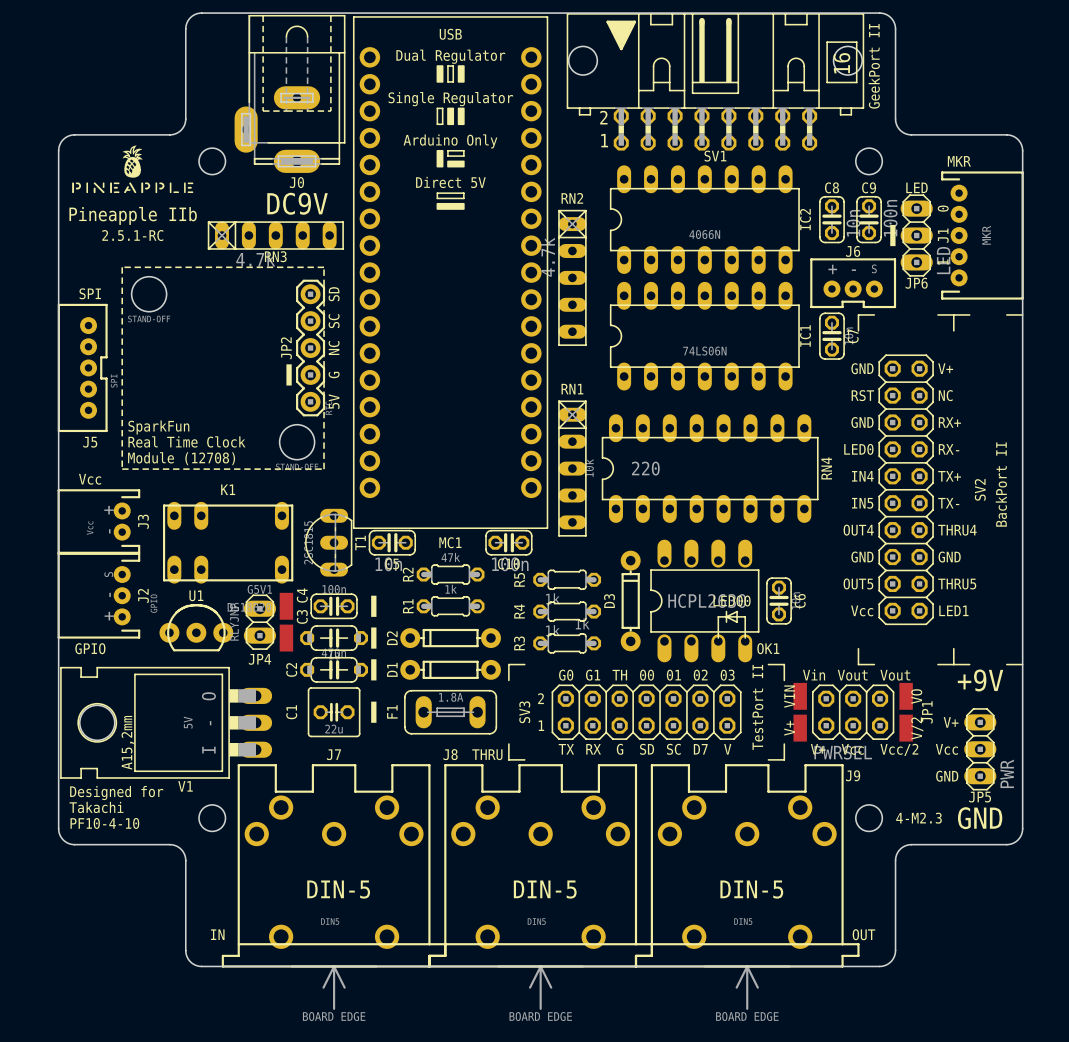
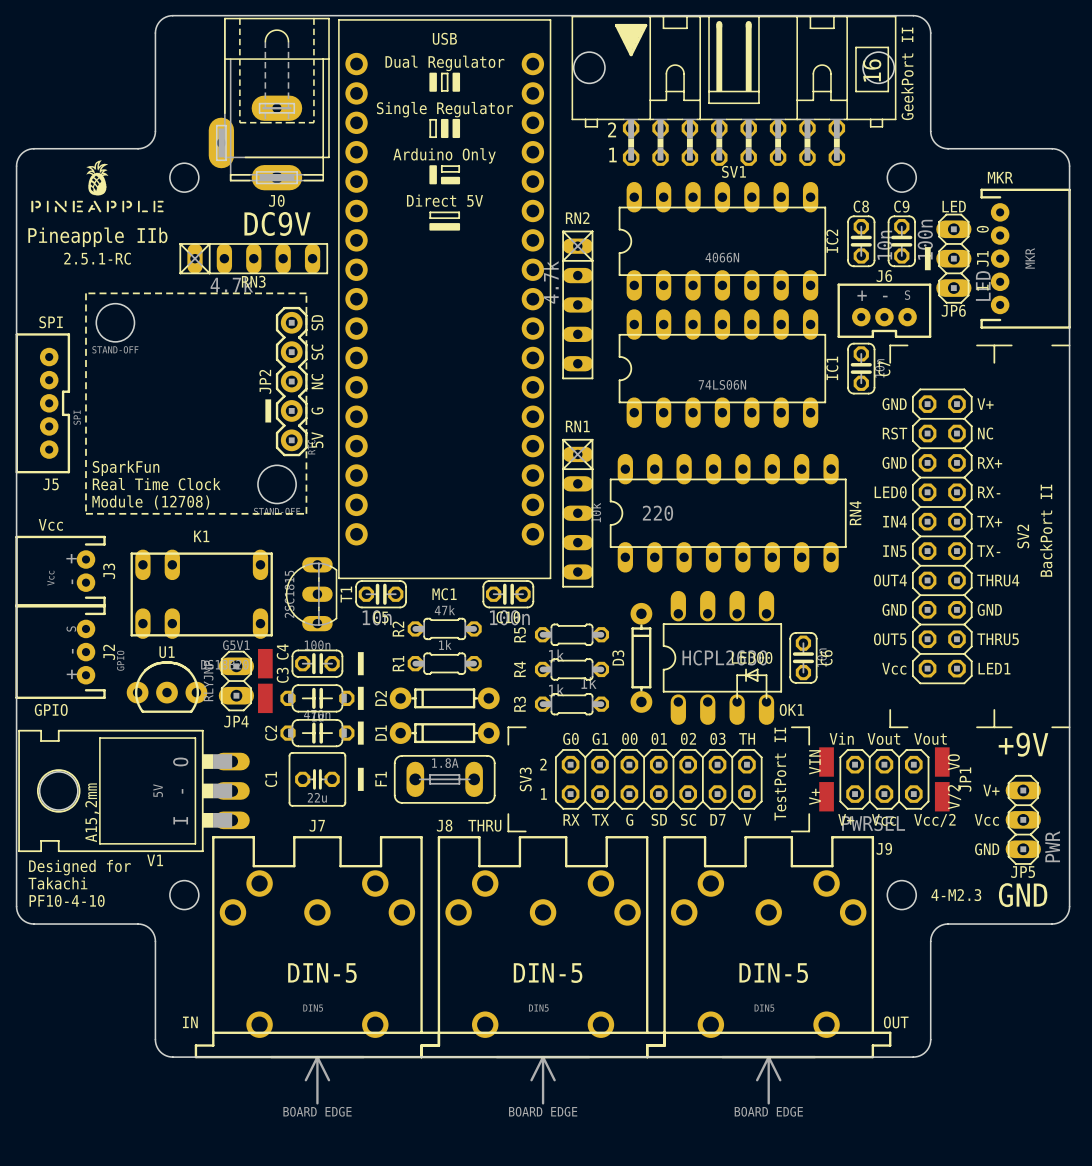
text: TH (619, 675) -> 00 (629, 738)
text: 00 (647, 675) -> 01 (659, 738)
text: 01 (673, 675) -> 02 (688, 738)
text: 02 (700, 675) -> 03 (717, 738)
text: 03 (727, 675) -> TH (747, 738)
text: TX (566, 749) -> RX (571, 819)
text: RX (593, 749) -> TX (600, 819)

